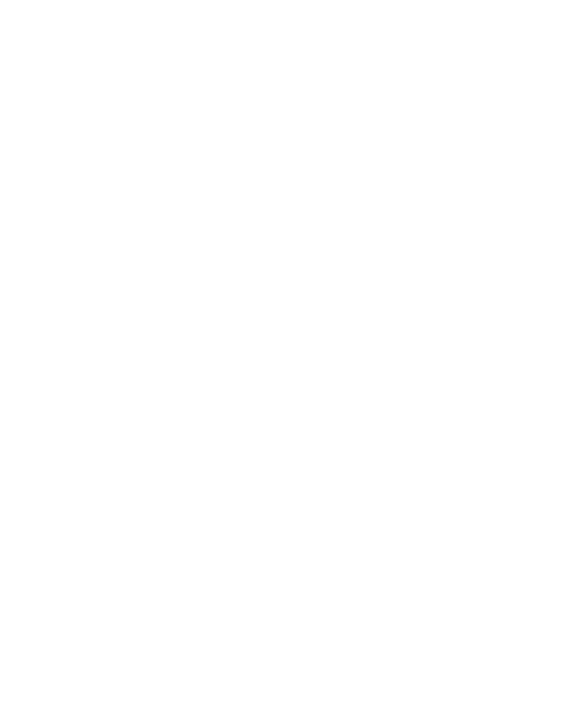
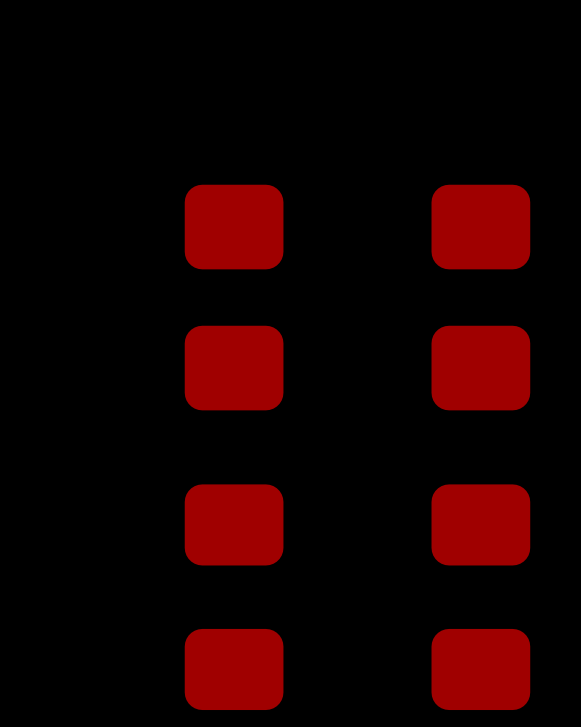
part: none -> (234, 297)
part: none -> (480, 297)
part: none -> (234, 597)
part: none -> (480, 597)

